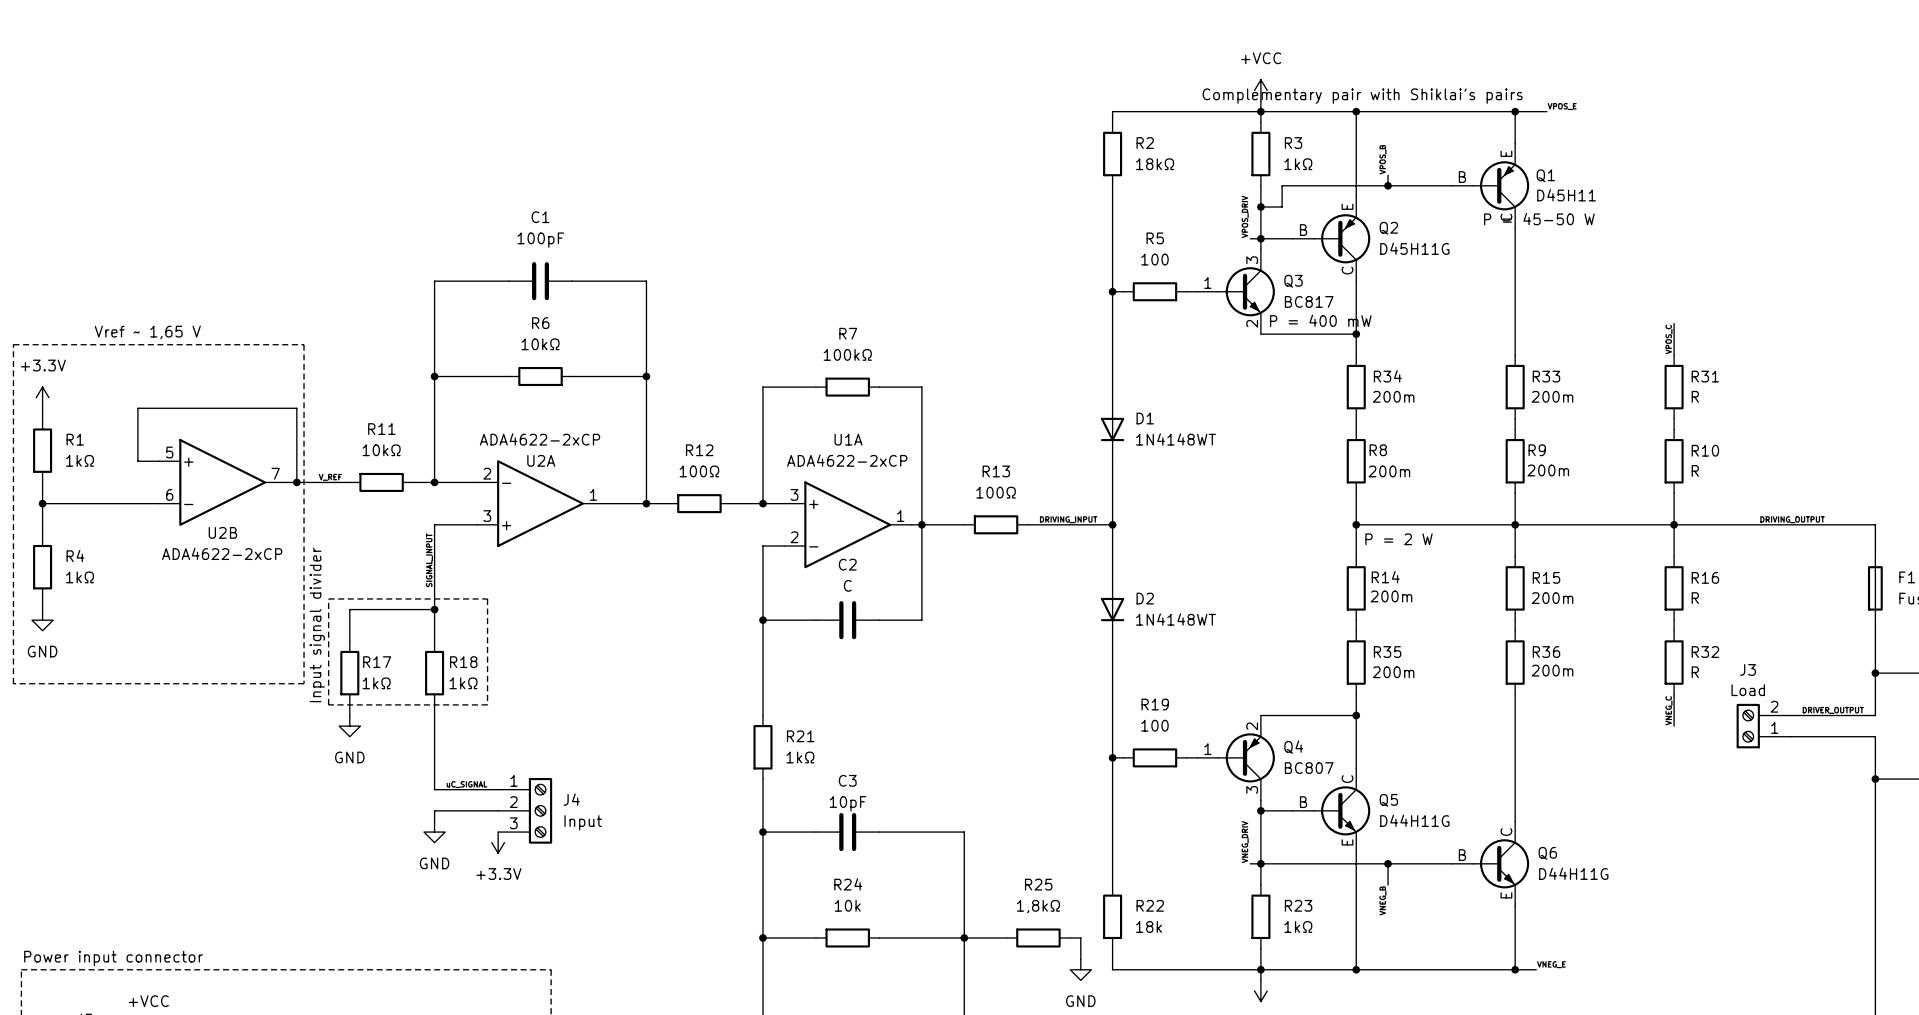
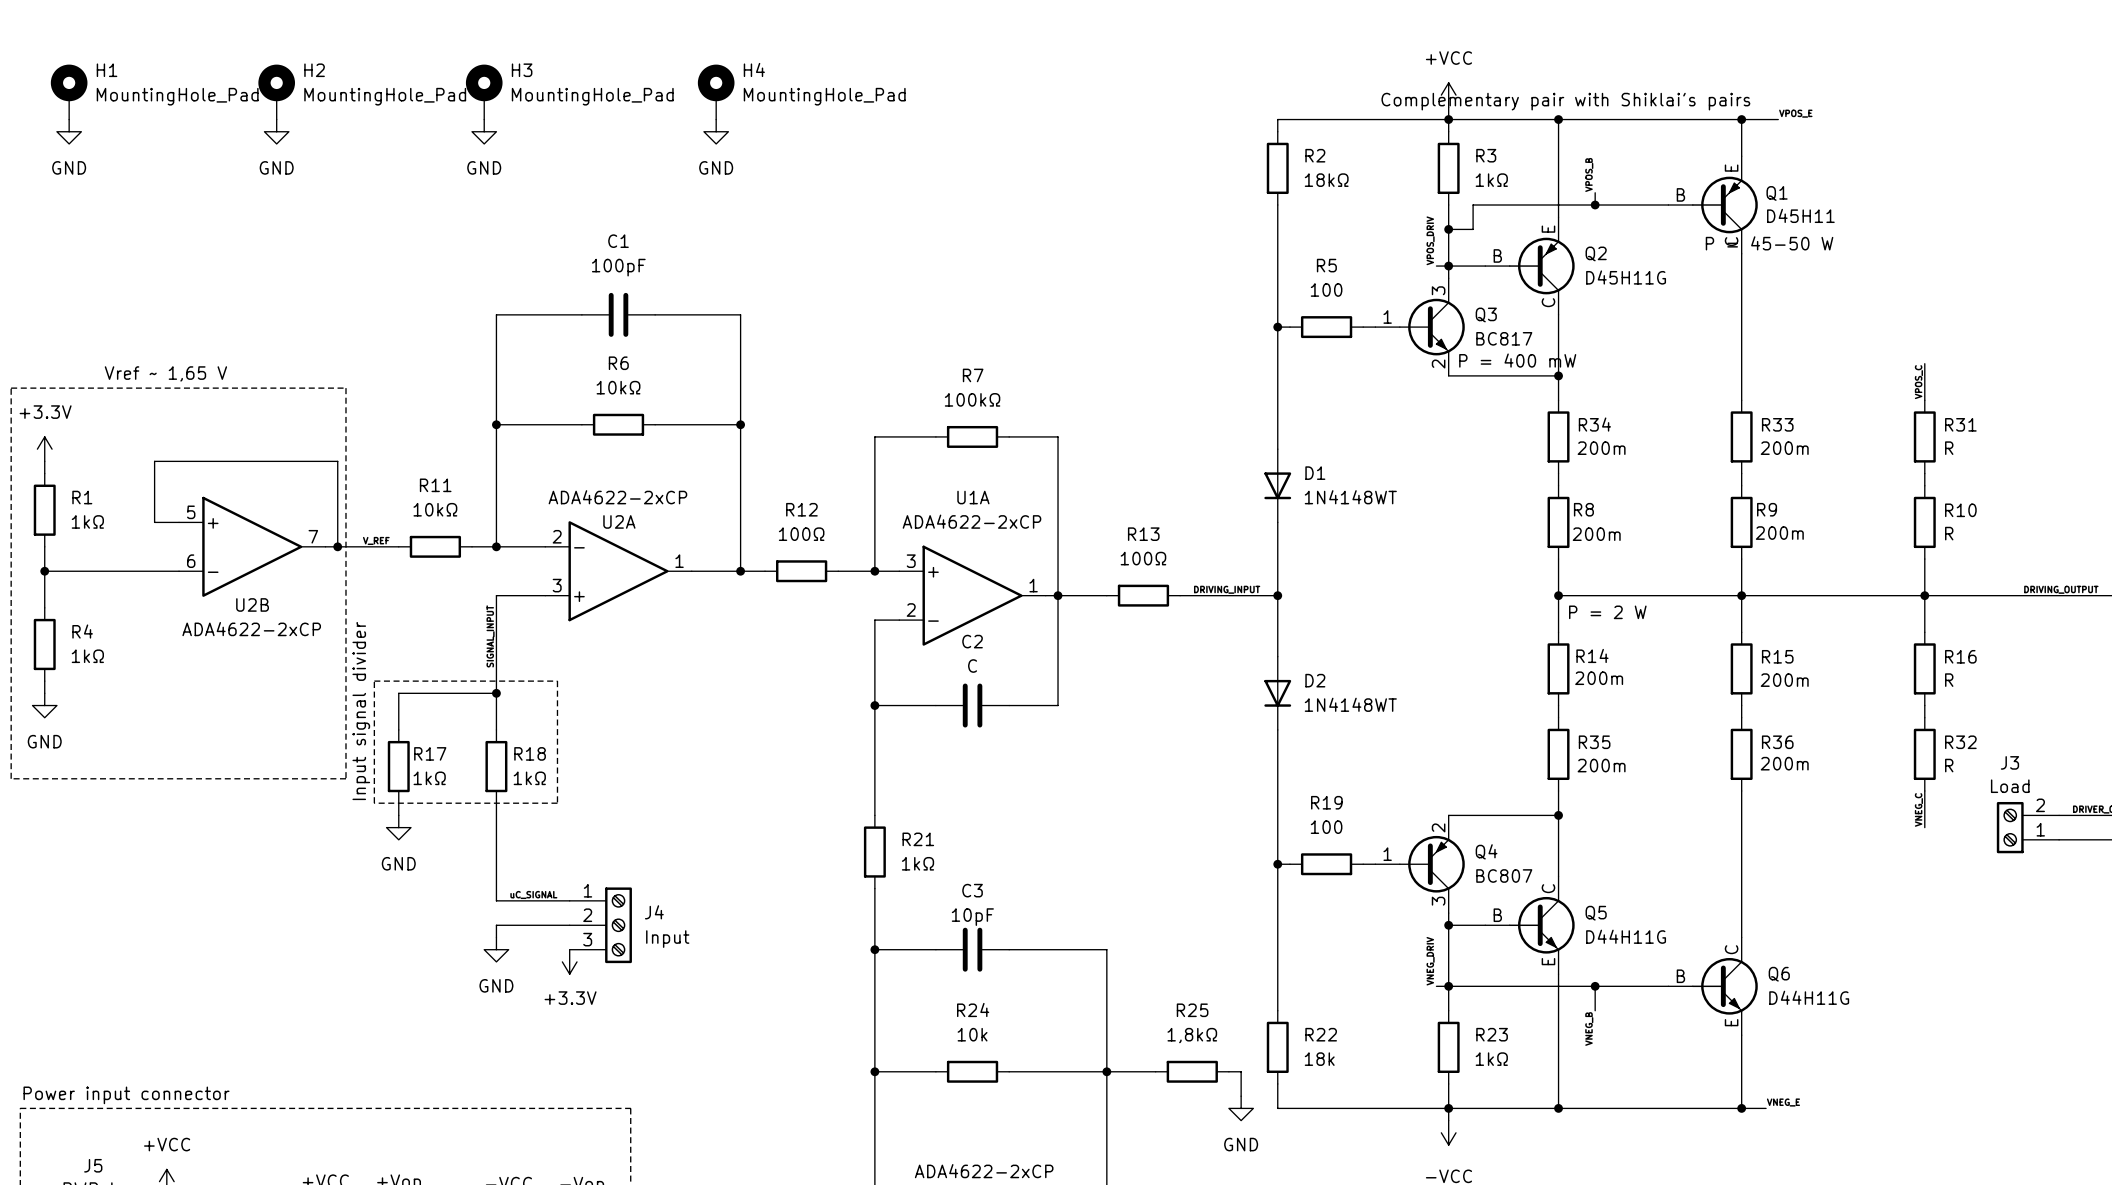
H1: none -> MountingHole_Pad (69, 92)
H2: none -> MountingHole_Pad (276, 92)
H3: none -> MountingHole_Pad (484, 92)
H4: none -> MountingHole_Pad (716, 92)
power symbol: none -> GND (69, 131)
power symbol: none -> GND (276, 131)
power symbol: none -> GND (484, 131)
power symbol: none -> GND (716, 131)

